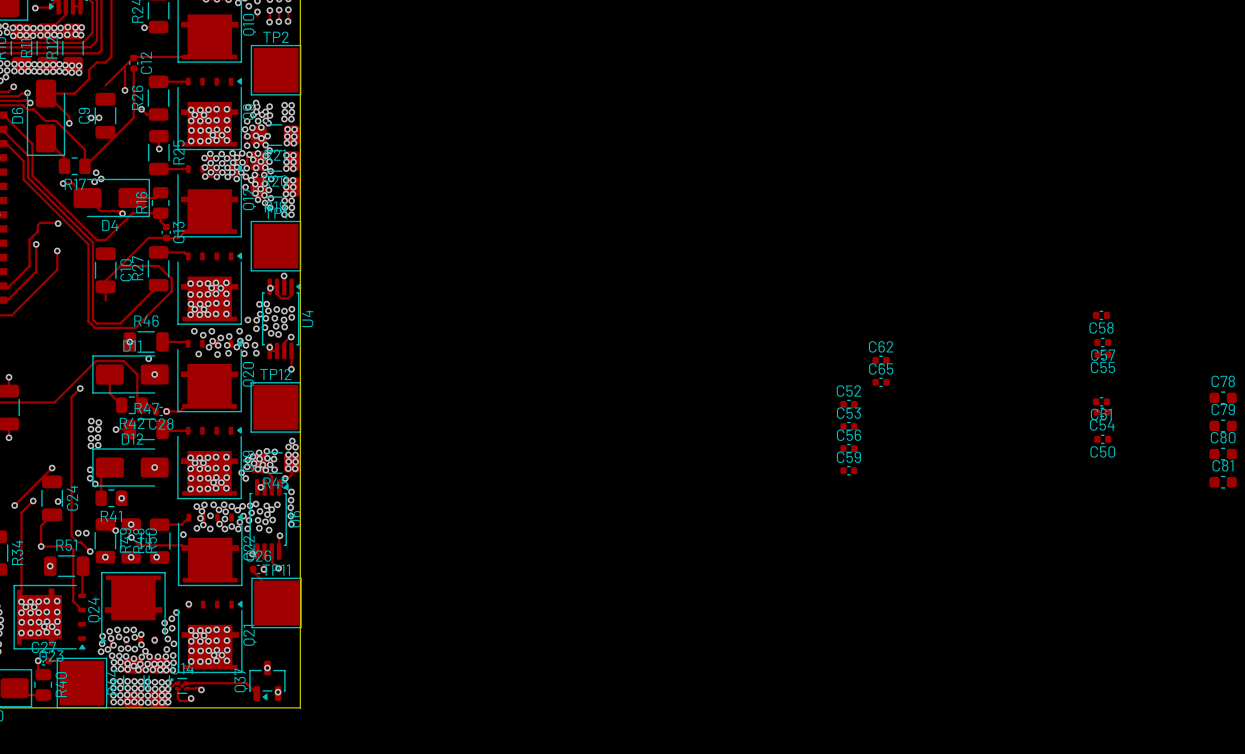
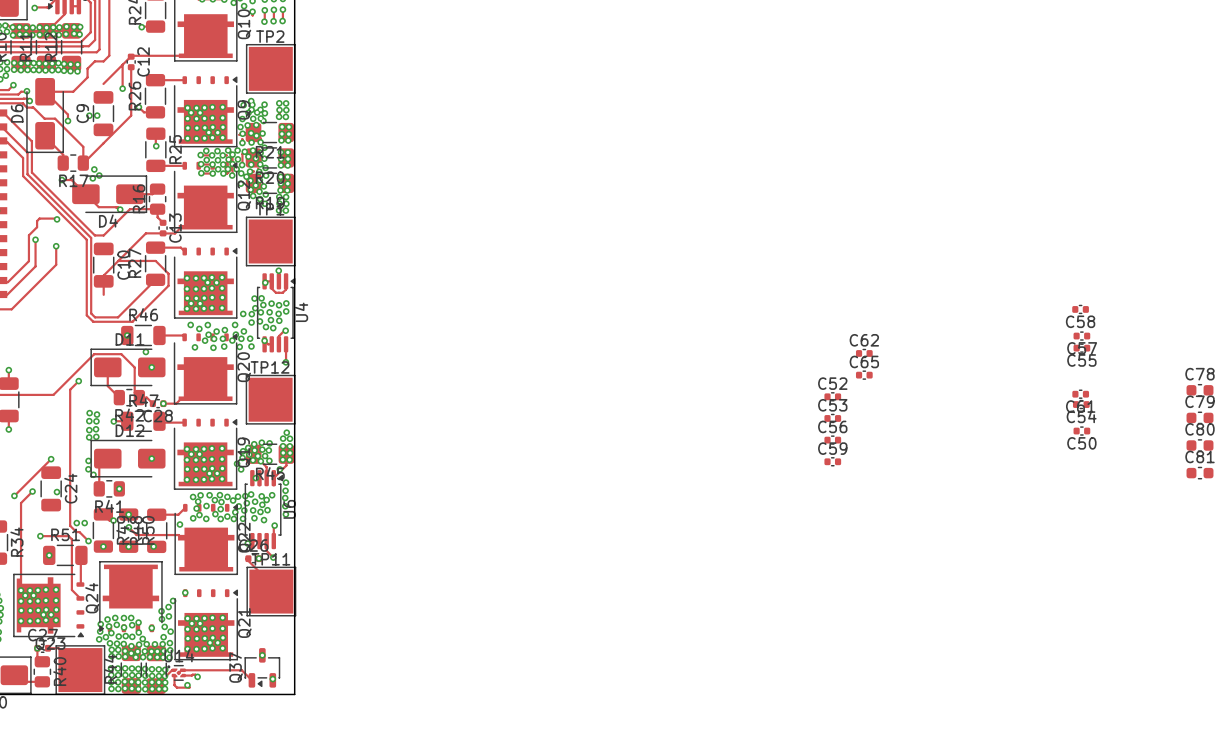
track: (52, 514) (41, 525) (41, 546) -> none

